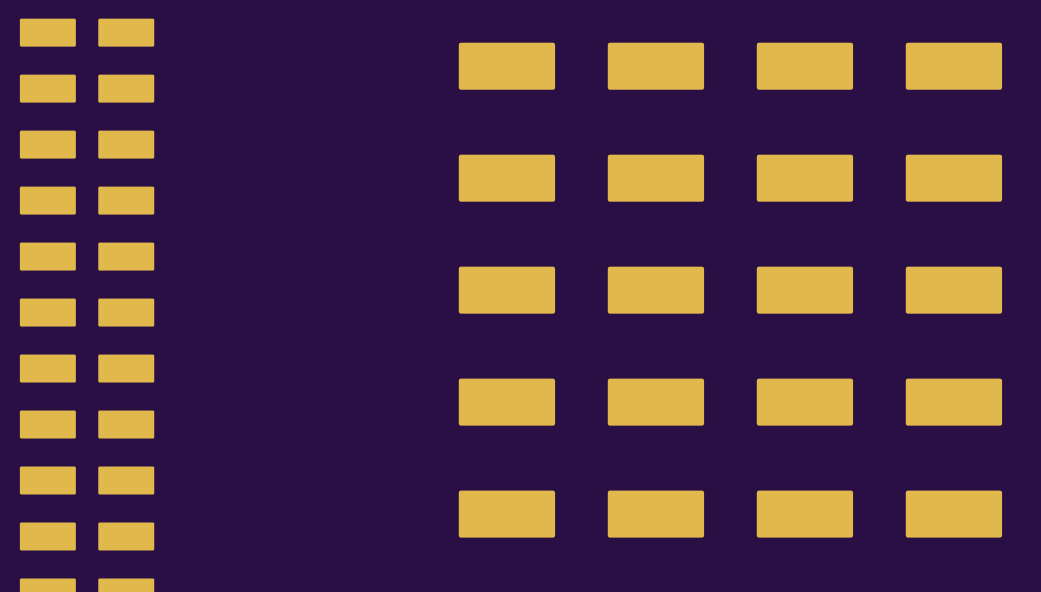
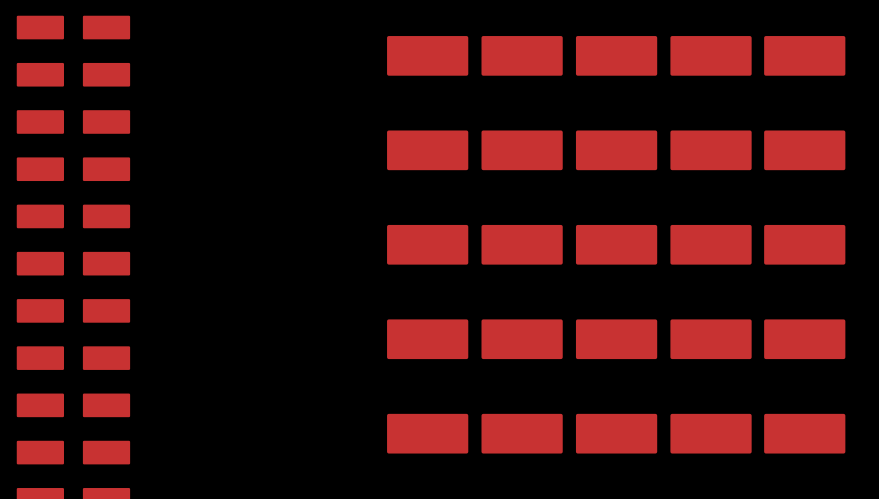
part position: (655, 66) -> (522, 55)
part: none -> (616, 55)
part: (804, 66) -> none
part: none -> (711, 55)
part position: (655, 178) -> (522, 150)
part: none -> (616, 150)
part: (804, 178) -> none
part: none -> (711, 150)
part position: (655, 290) -> (522, 244)
part: none -> (616, 244)
part: (804, 290) -> none
part: none -> (711, 244)
part position: (655, 402) -> (522, 339)
part: none -> (616, 339)
part: (804, 402) -> none
part: none -> (711, 339)
part position: (655, 514) -> (522, 433)
part: none -> (616, 433)
part: (804, 514) -> none
part: none -> (711, 433)

